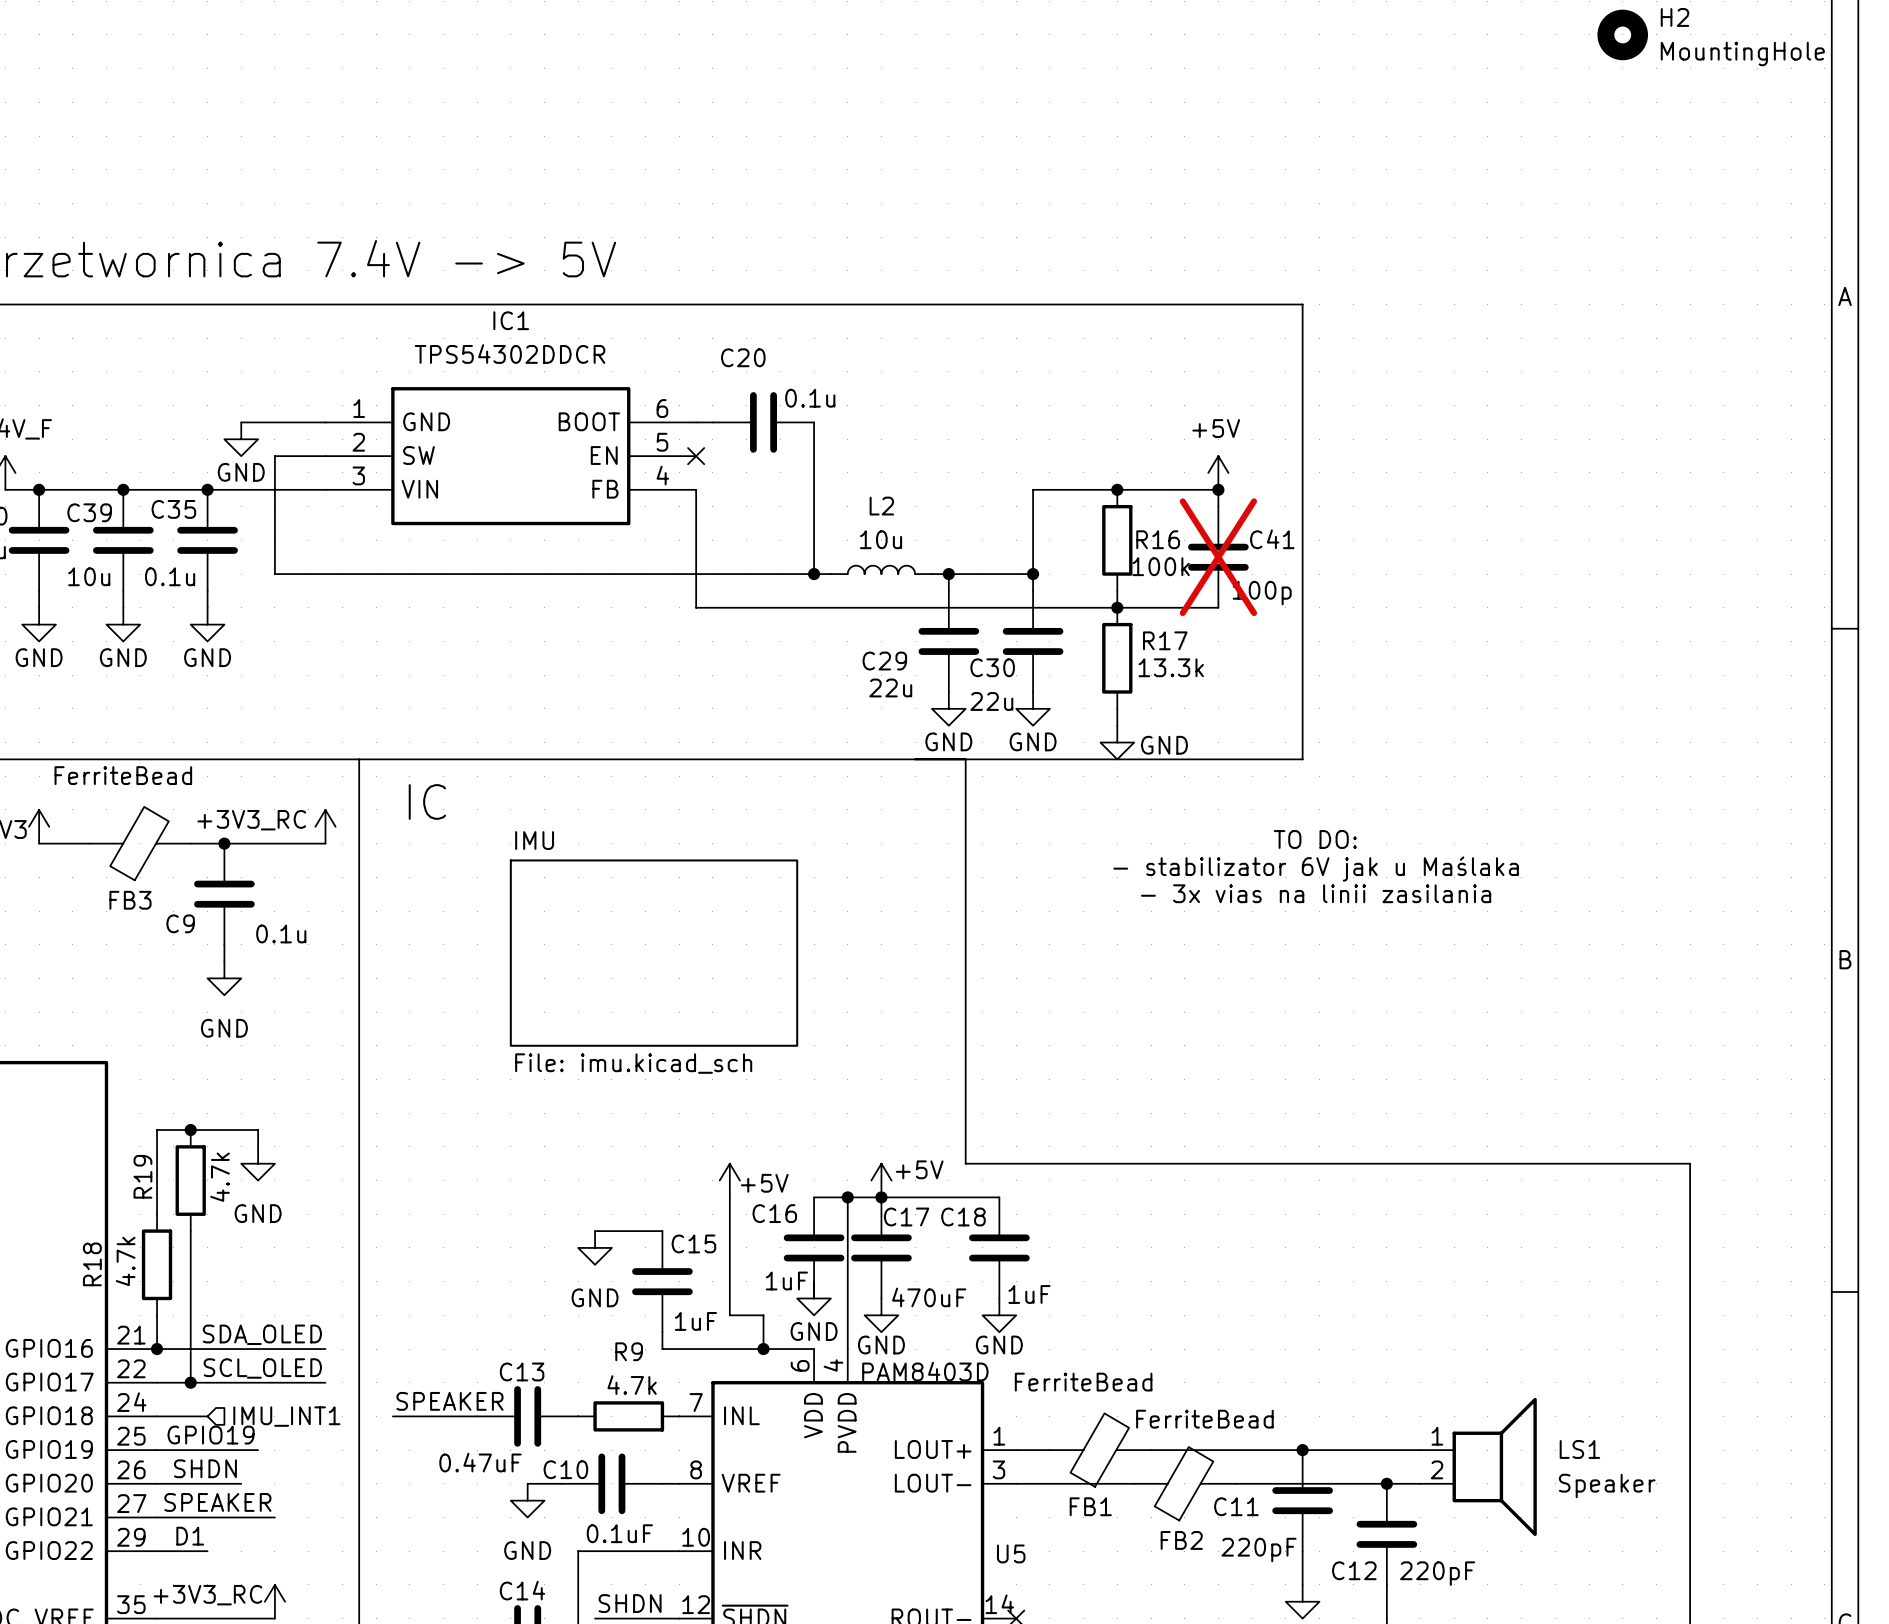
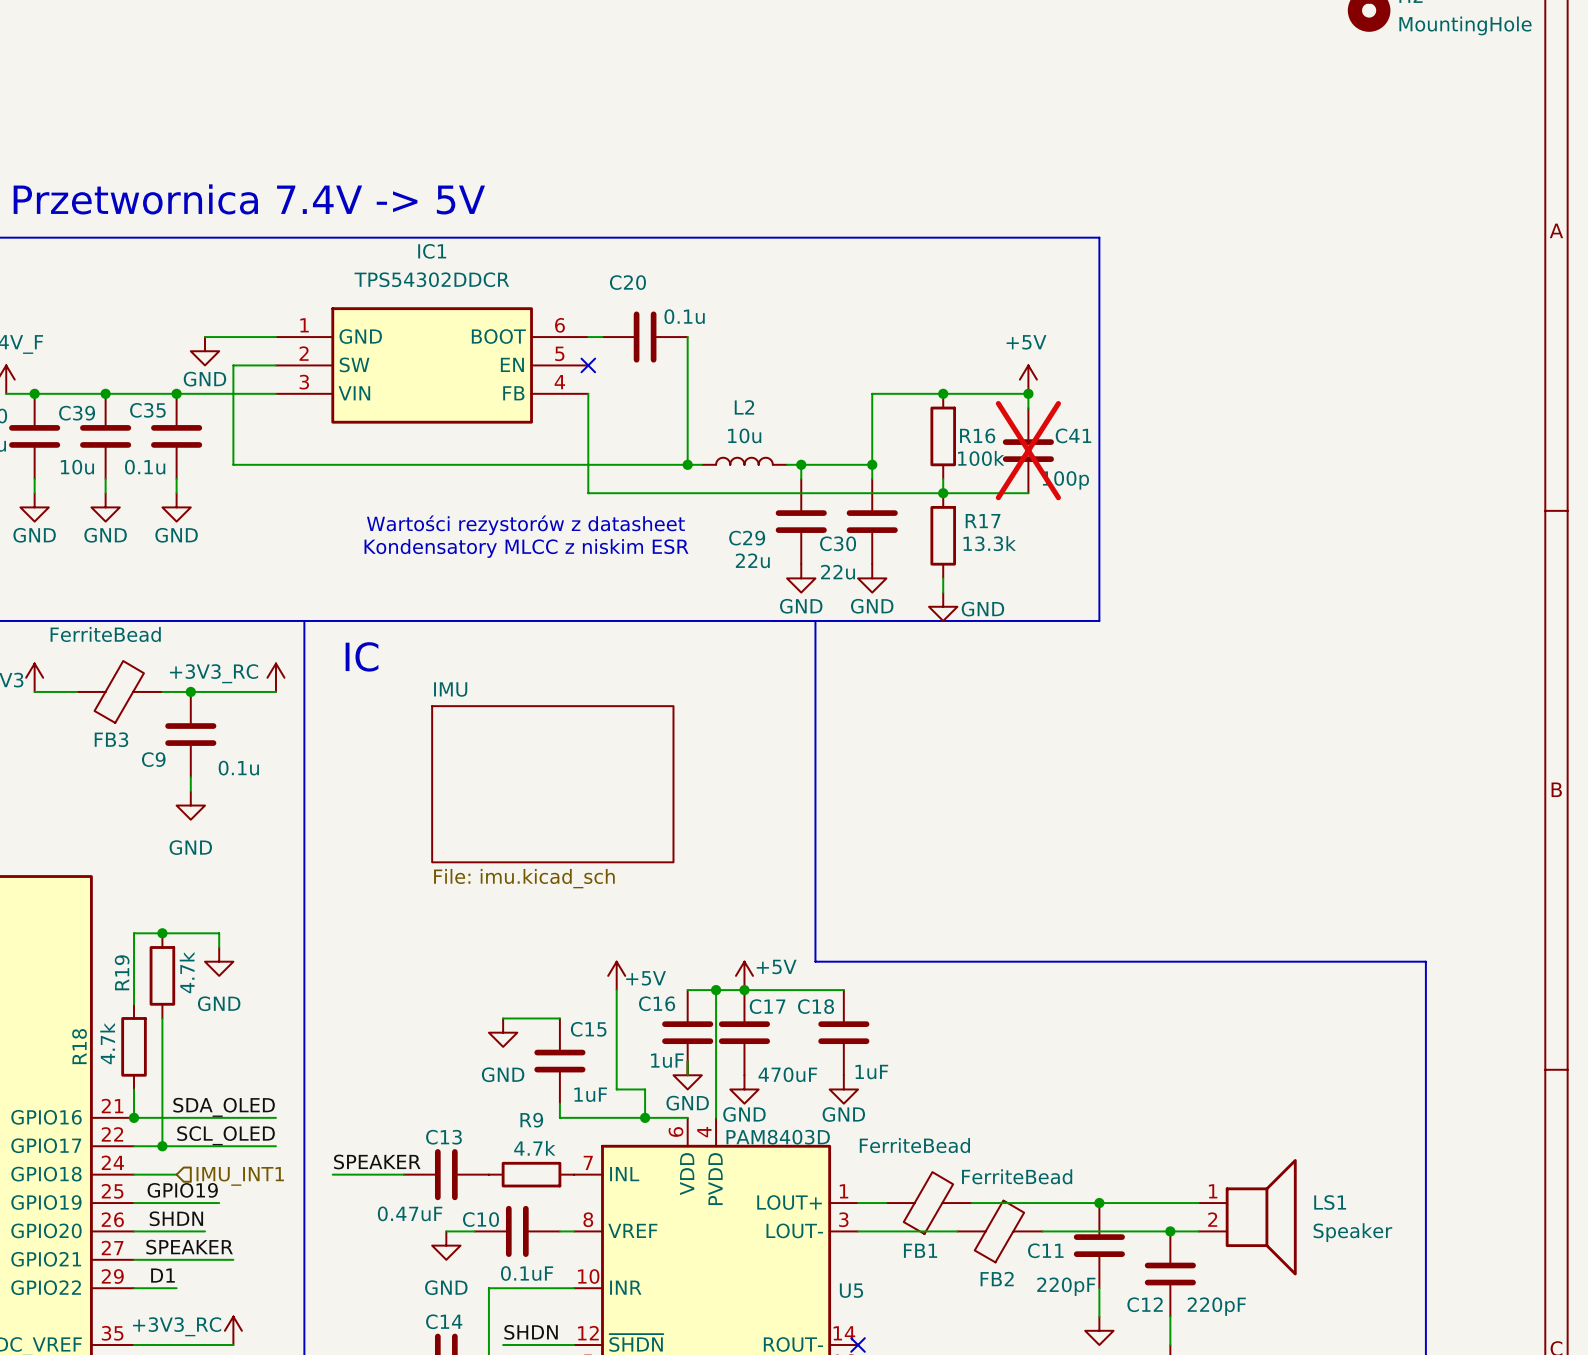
text: none -> Wartości rezystorów z datasheet (525, 525)
text: none -> Kondensatory MLCC z niskim ESR (526, 548)
text: TO DO: (1315, 839) -> none
text: - stabilizator 6V jak u Maślaka (1316, 869) -> none
text: - 3x vias na linii zasilania (1316, 893) -> none

